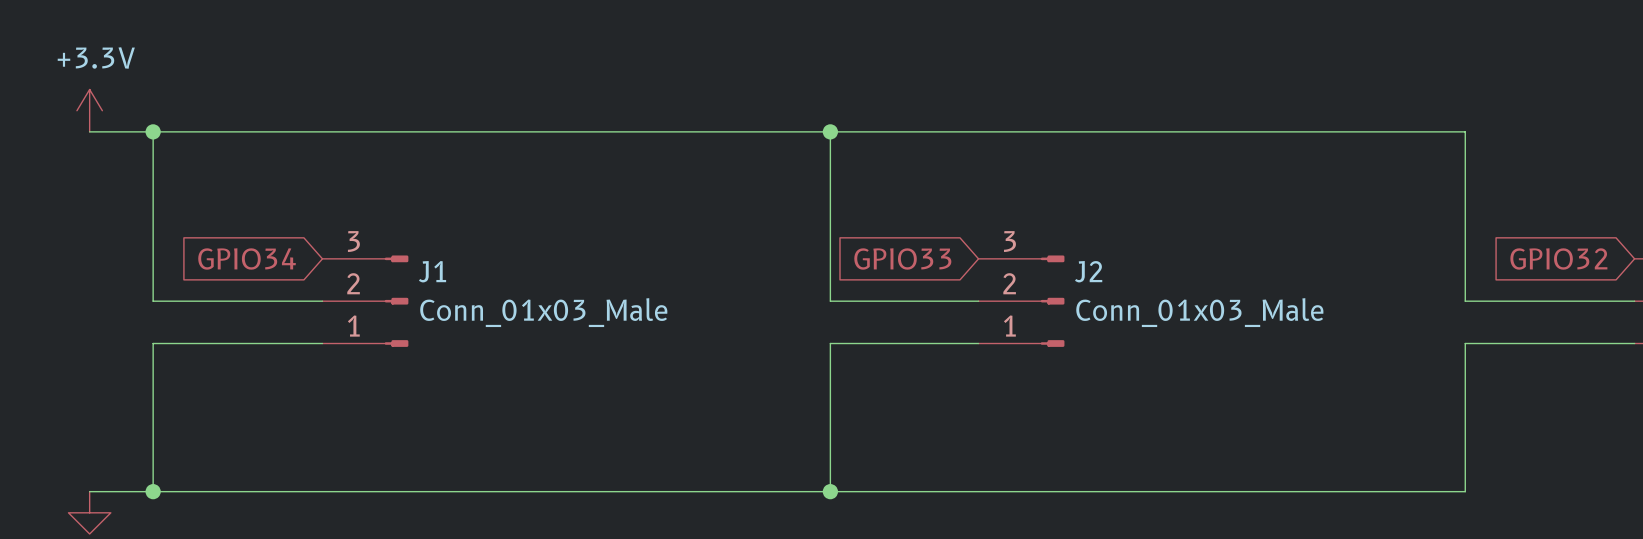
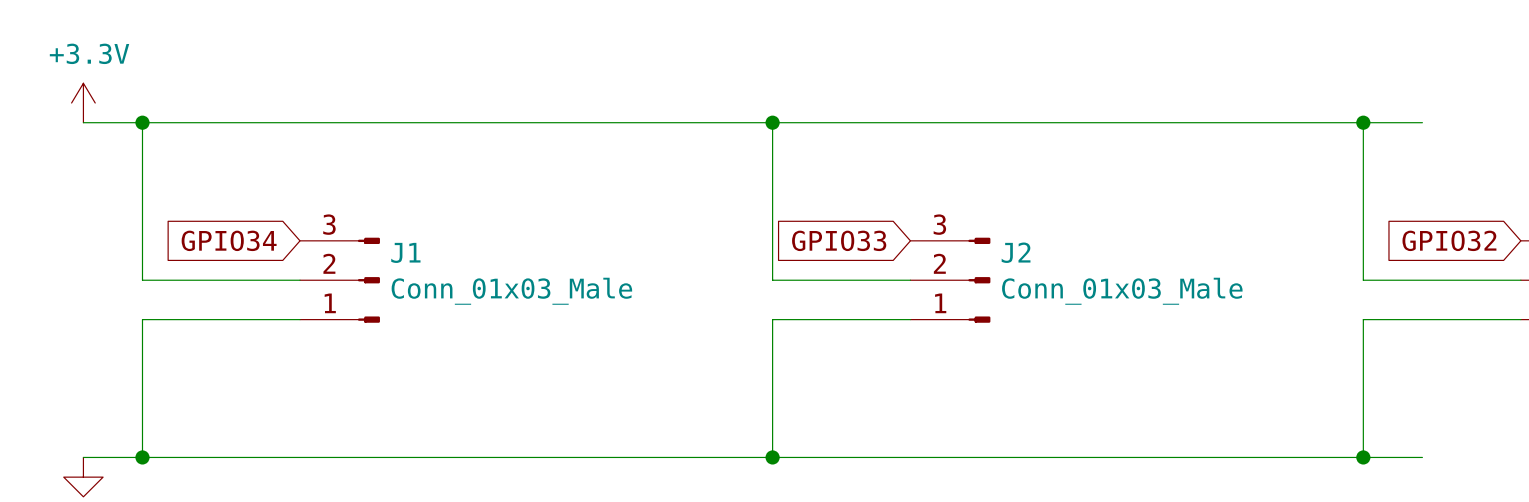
wire: none -> (1363, 122) (1422, 122)
junction: none -> (1363, 122)
wire: none -> (1363, 457) (1422, 457)
junction: none -> (1363, 457)

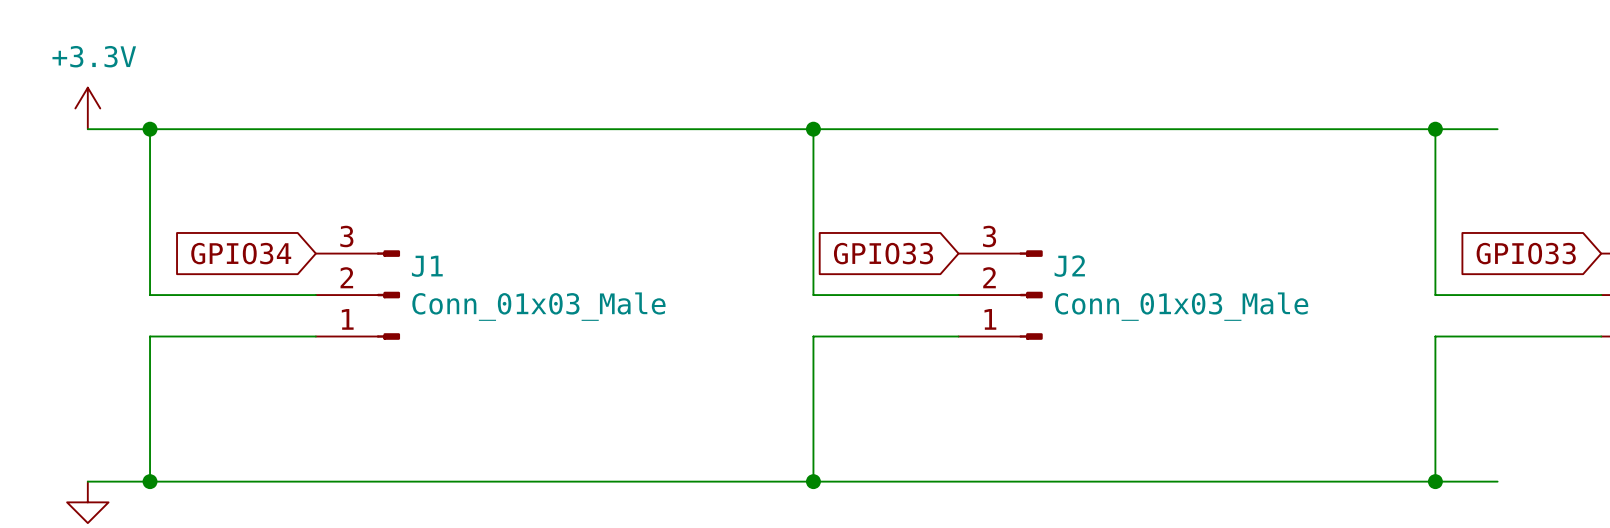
global label: GPIO32 (1449, 240) -> GPIO33 (1526, 253)

